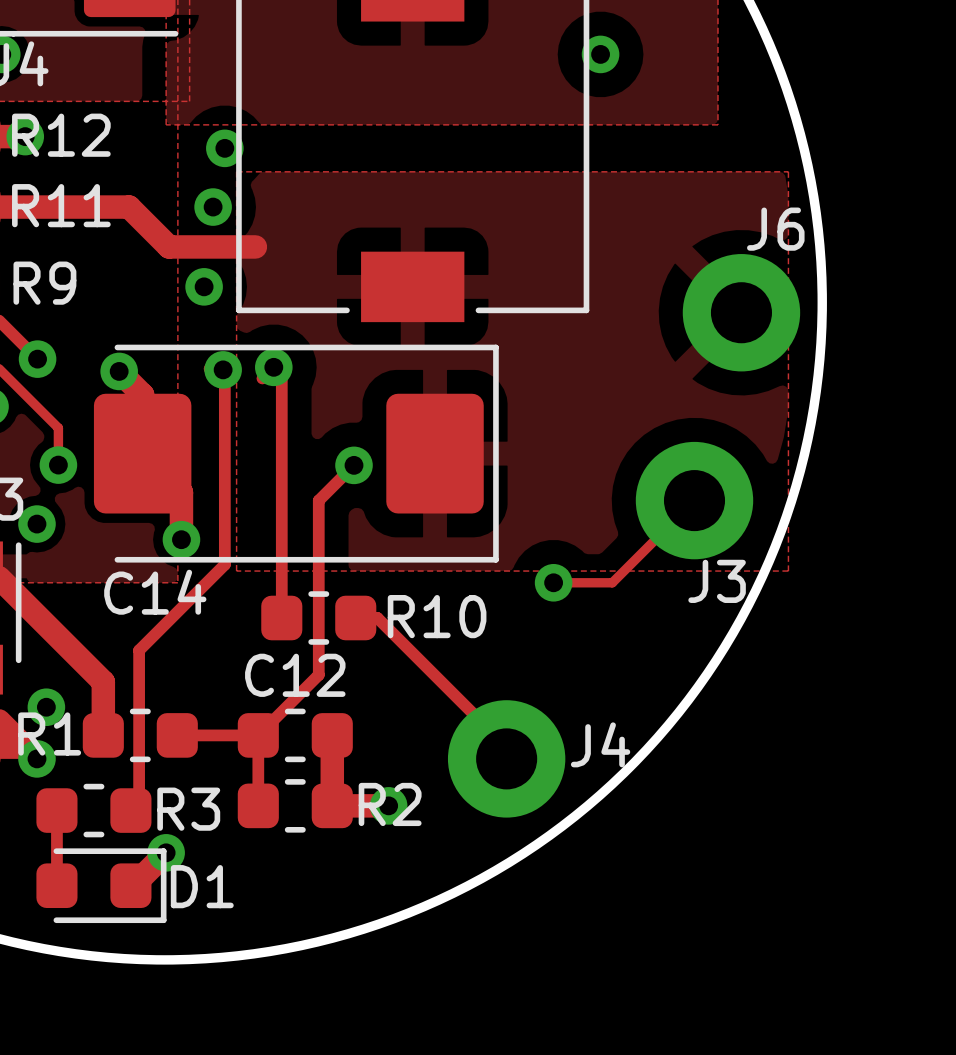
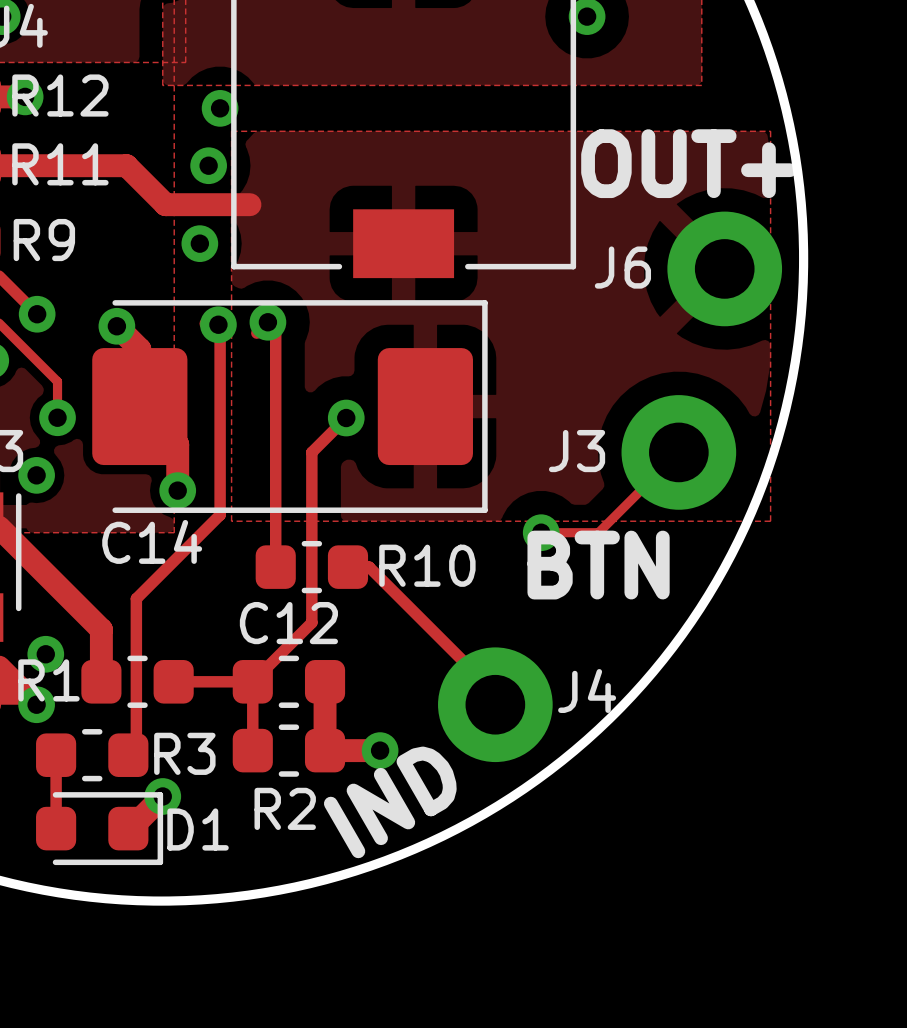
text: none -> OUT+ (689, 163)
J6 name position: J6 (775, 229) -> J6 (622, 267)
J3 name position: J3 (717, 581) -> J3 (577, 451)
text: none -> BTN (598, 565)
R2 name position: R2 (390, 804) -> R2 (285, 808)
text: none -> IND (390, 802)

